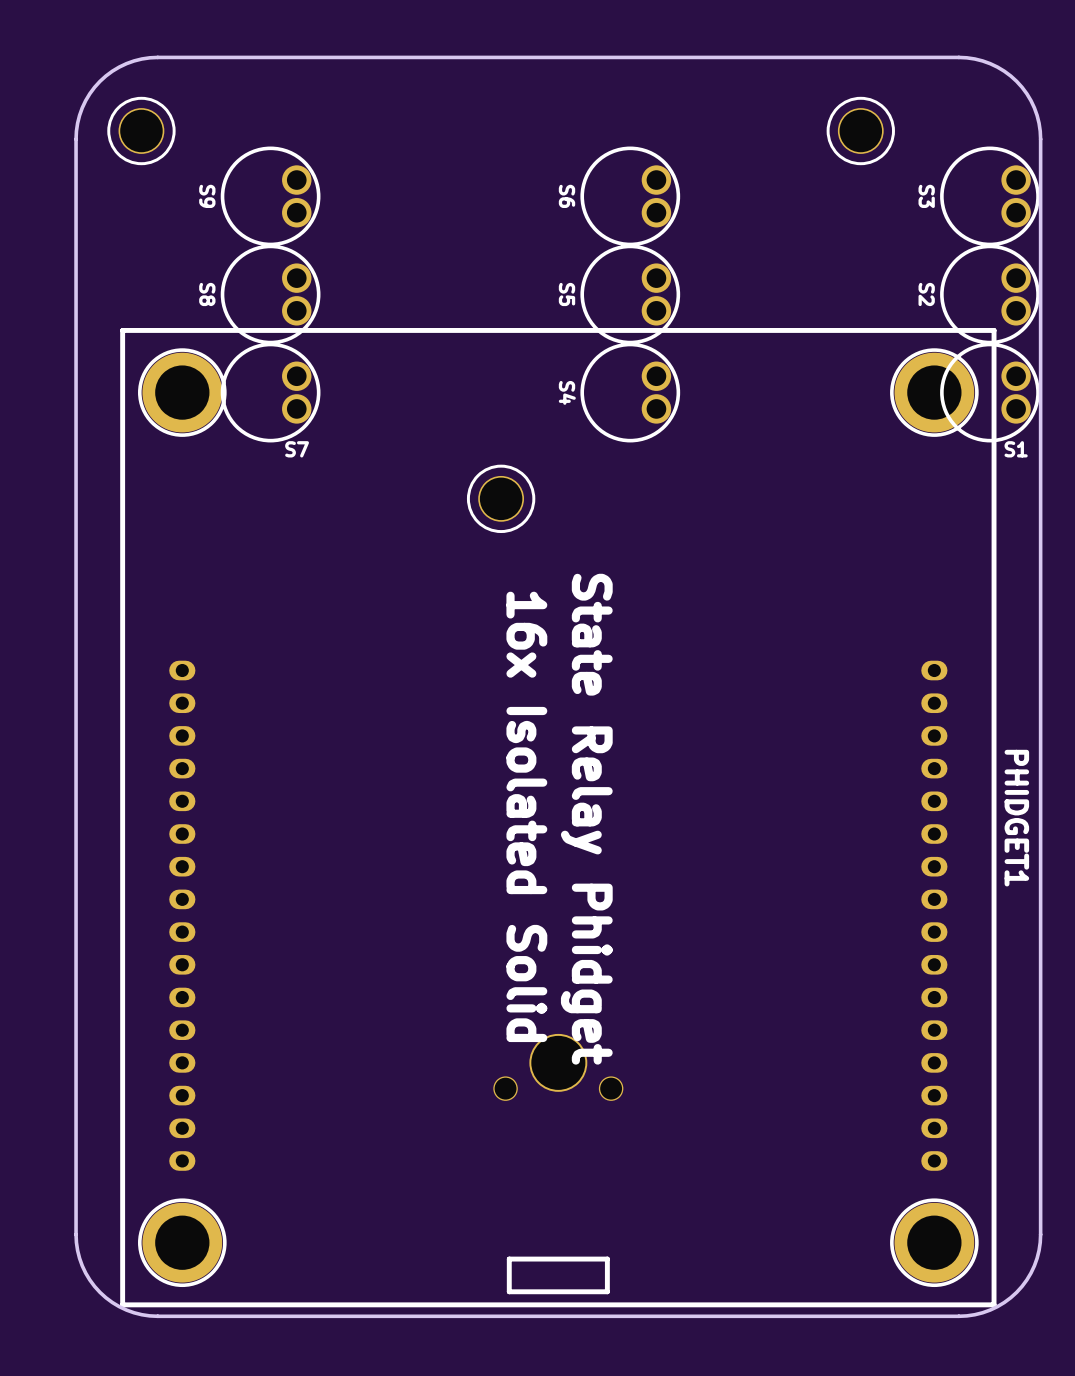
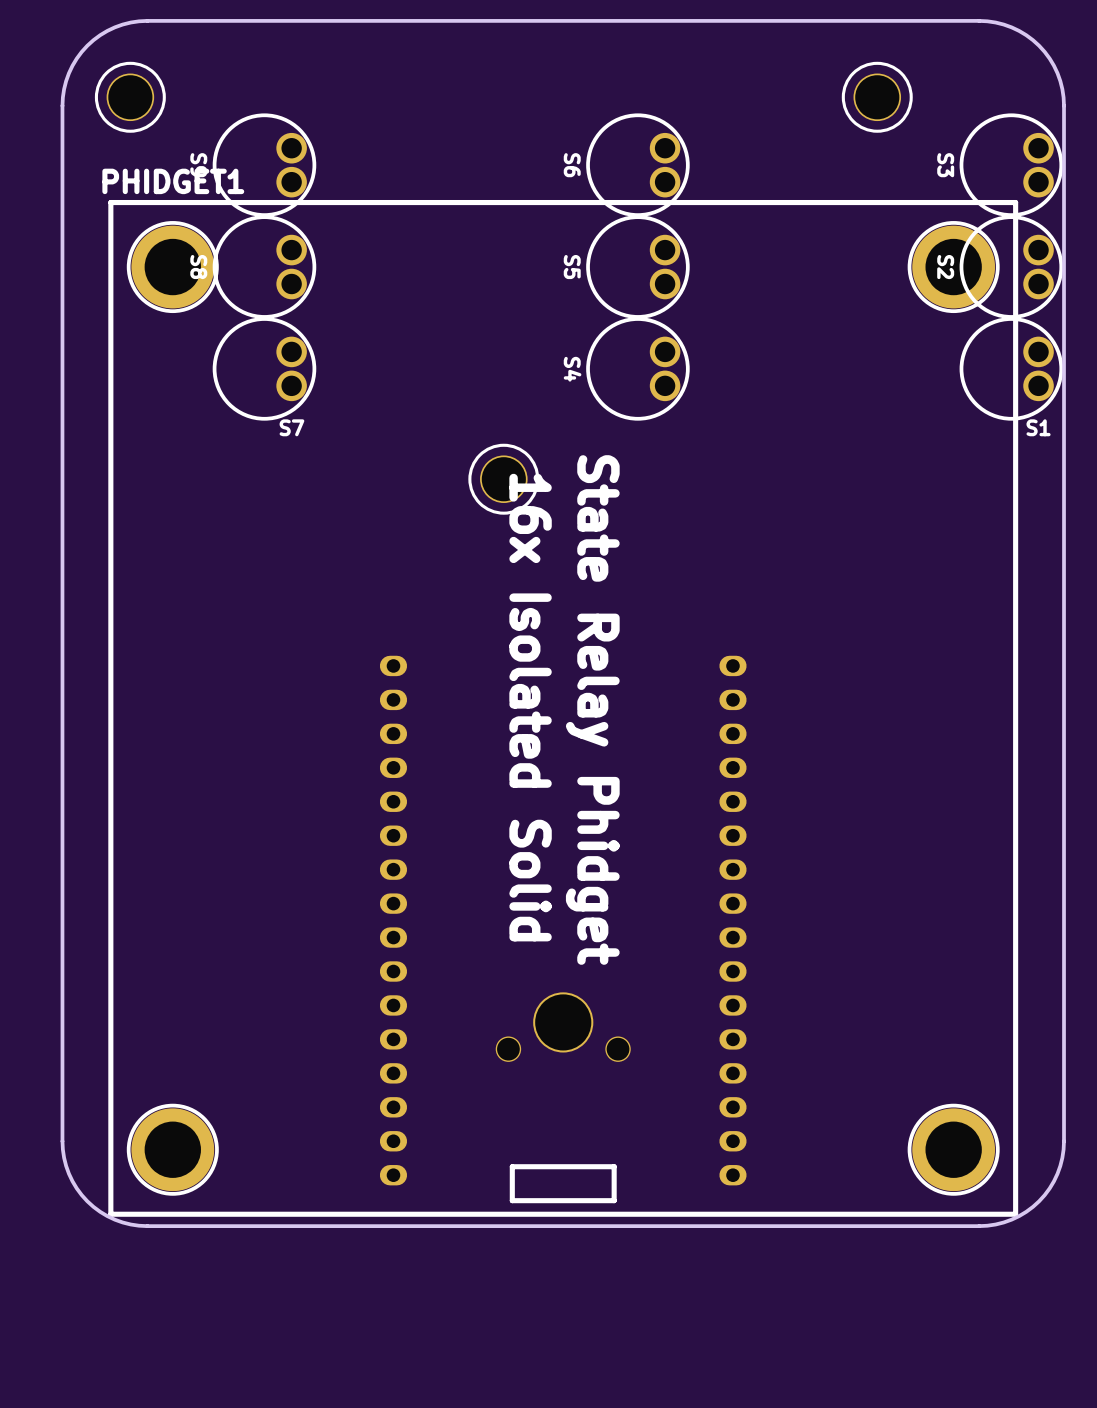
PHIDGET1 footprint: [120, 328, 997, 1308] -> [108, 199, 1019, 1217]
PHIDGET1 name position: PHIDGET1 (1016, 818) -> PHIDGET1 (173, 181)
part position: (558, 1067) -> (563, 1027)
board edge: (1040, 1136) (1040, 1234) (1039, 1250) (1034, 1265) (1022, 1286) (1004, 1302) (982, 1312) (958, 1316) (157, 1316) (141, 1314) (119, 1306) (105, 1297) (89, 1279) (82, 1265) (77, 1250) (76, 1234) (76, 1136) -> (1064, 1141) (1062, 1157) (1057, 1173) (1049, 1188) (1039, 1201) (1026, 1211) (1011, 1219) (995, 1224) (979, 1226) (139, 1225) (122, 1222) (107, 1216) (87, 1201) (76, 1188) (68, 1173) (64, 1157) (62, 1141)

